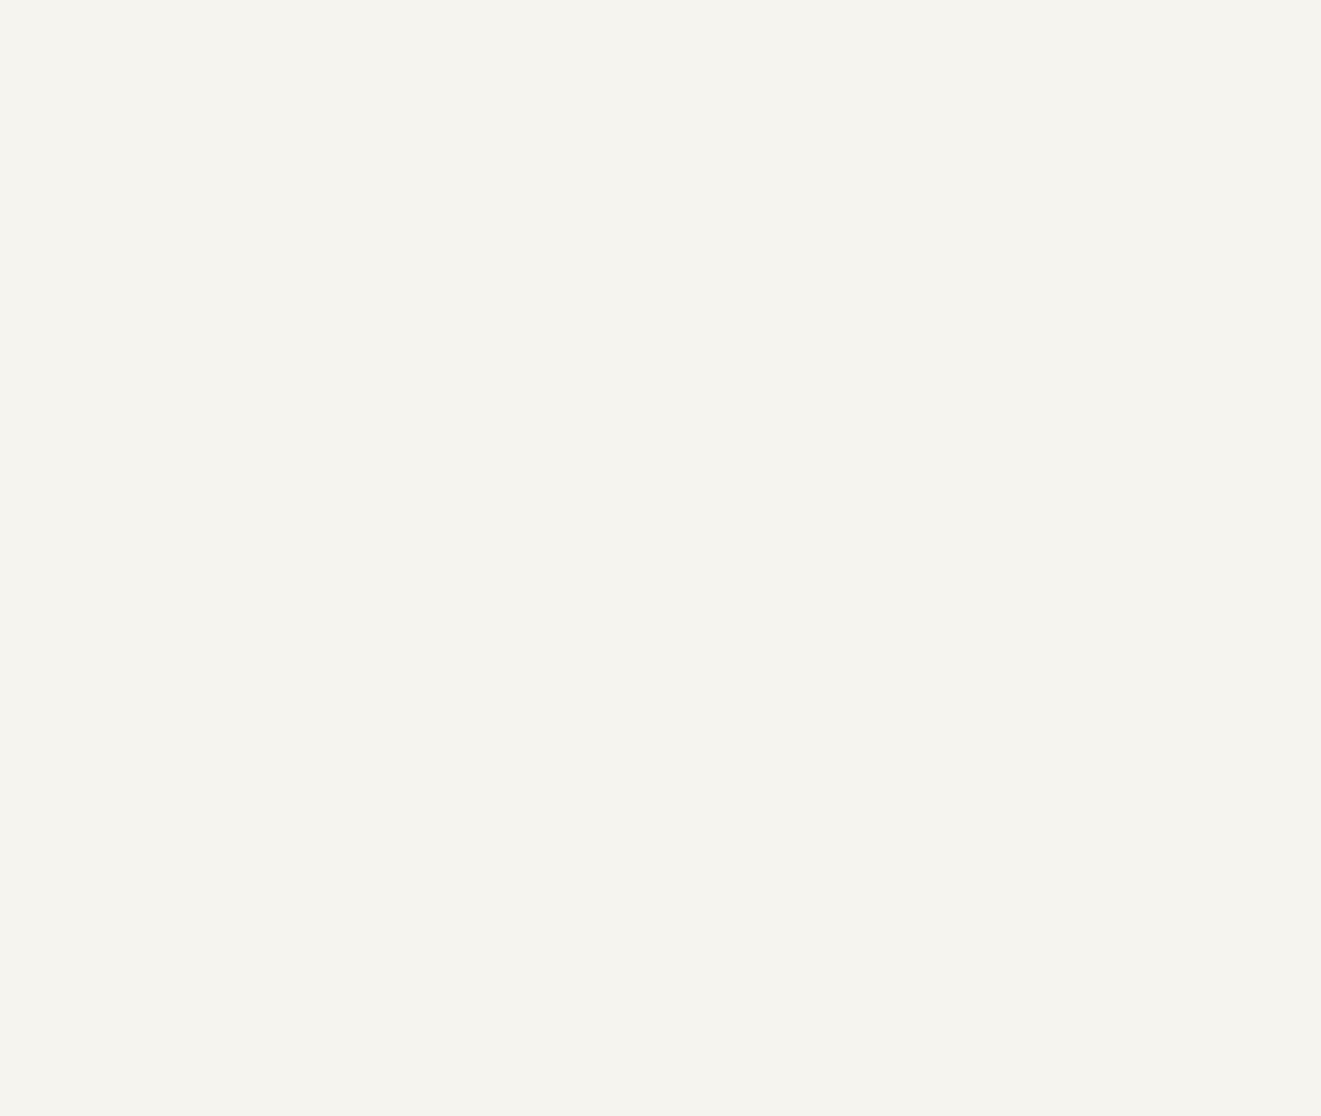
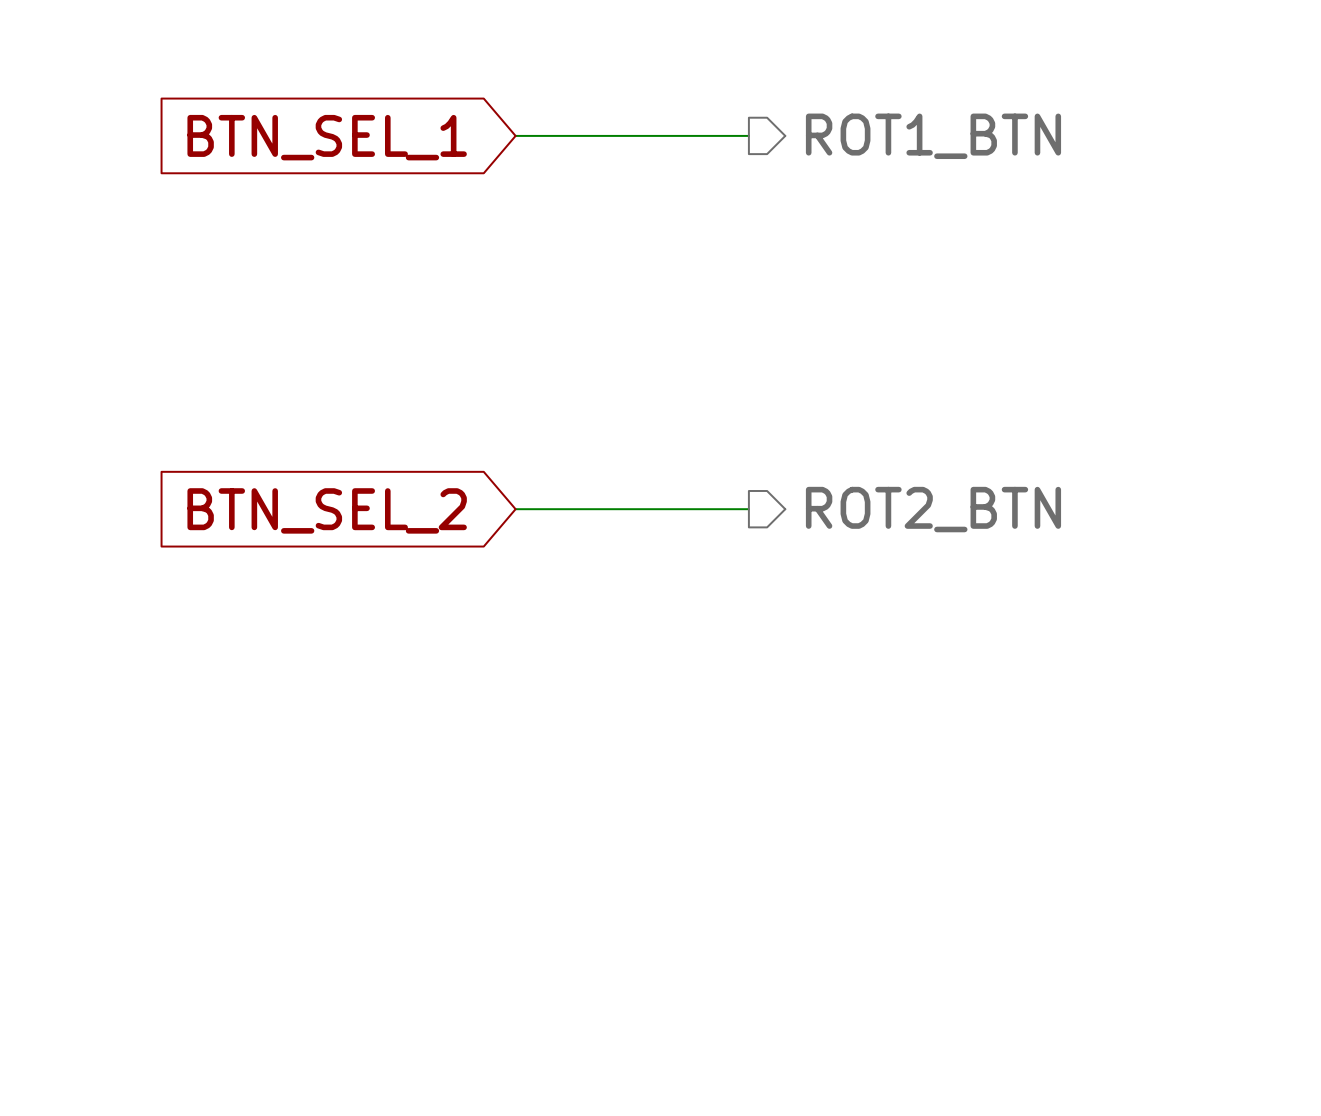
wire: none -> (515, 135) (748, 135)
sheet pin: none -> ROT1_BTN (933, 136)
global label: none -> BTN_SEL_1 (327, 137)
wire: none -> (515, 509) (748, 509)
sheet pin: none -> ROT2_BTN (933, 509)
global label: none -> BTN_SEL_2 (327, 510)

